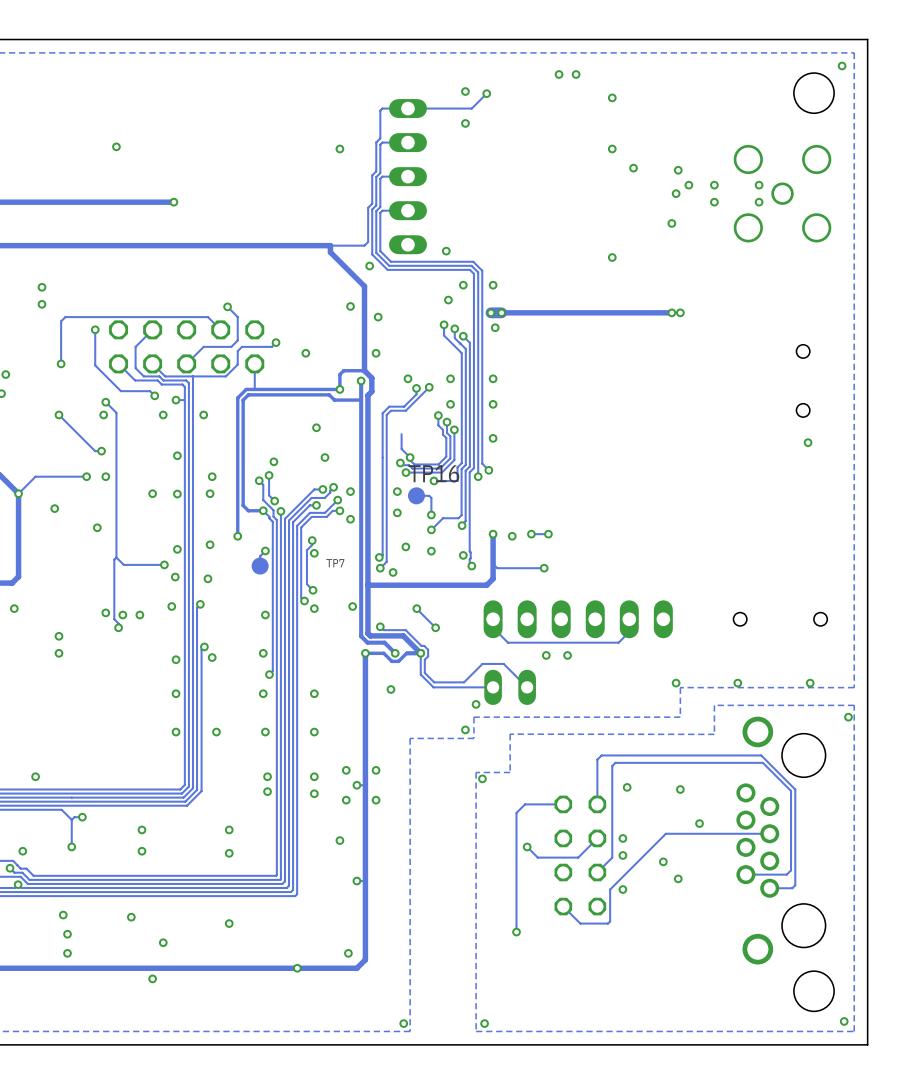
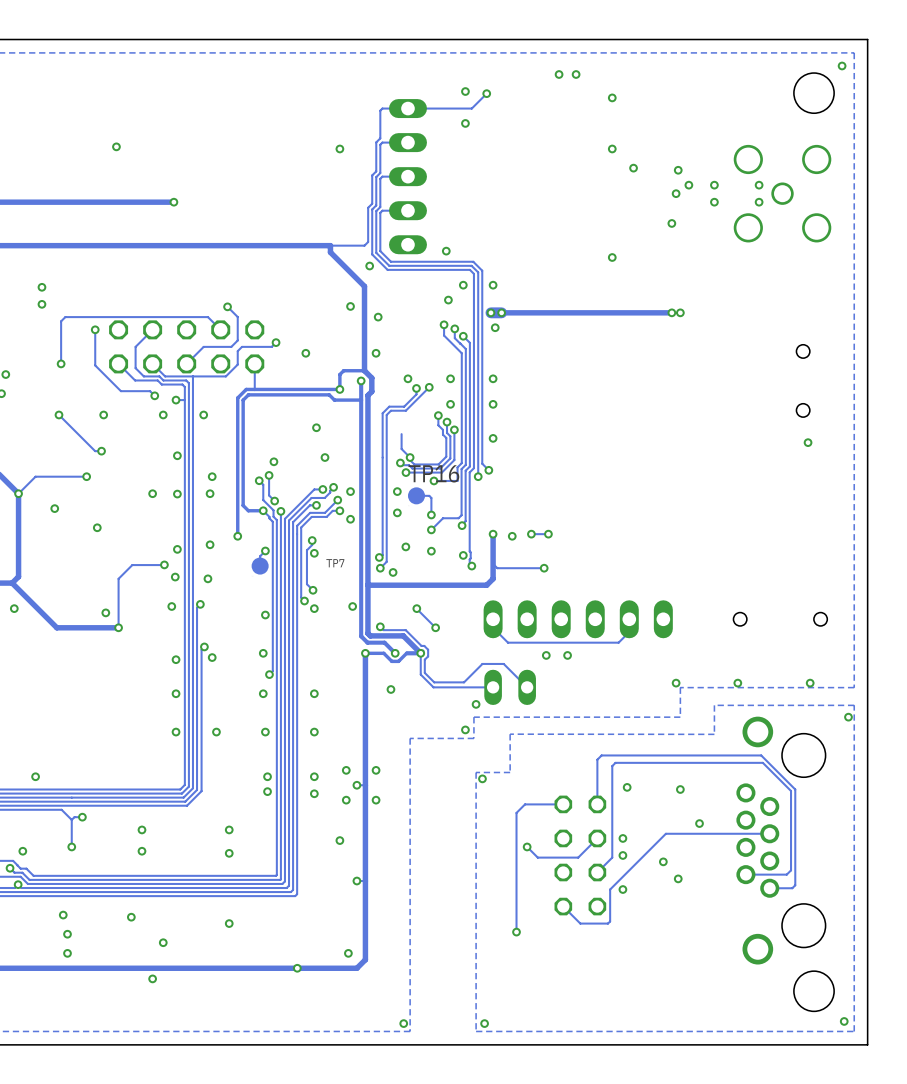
track: (105, 402) (116, 412) (116, 557) -> none
via: (105, 402) -> none
via: (105, 476) -> none
track: (116, 557) (114, 559) (114, 619) (118, 623) -> (161, 565) (132, 565) (118, 578) (118, 623)
track: (116, 557) (123, 564) (164, 564) -> none
track: none -> (12, 583) (56, 627) (118, 627)
via: (122, 615) -> none
via: (139, 615) -> none
via: (58, 636) -> none
via: (58, 653) -> none

